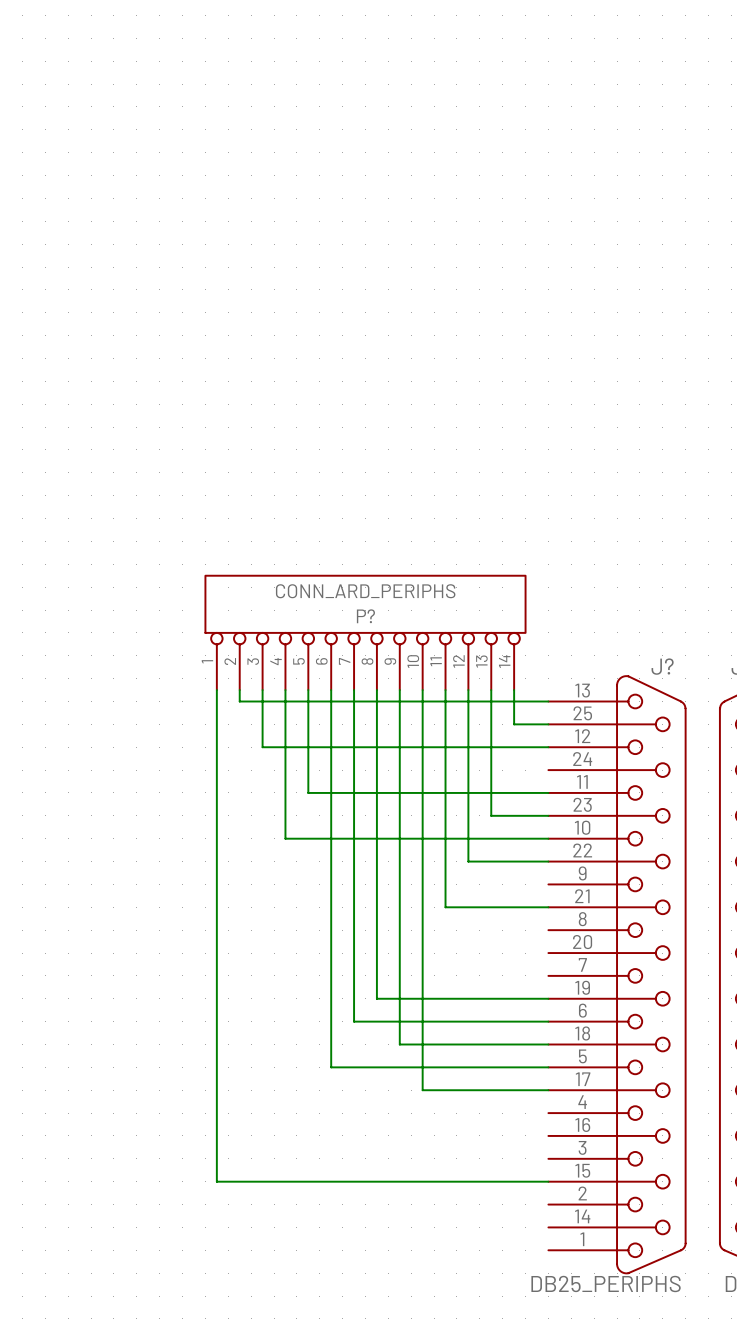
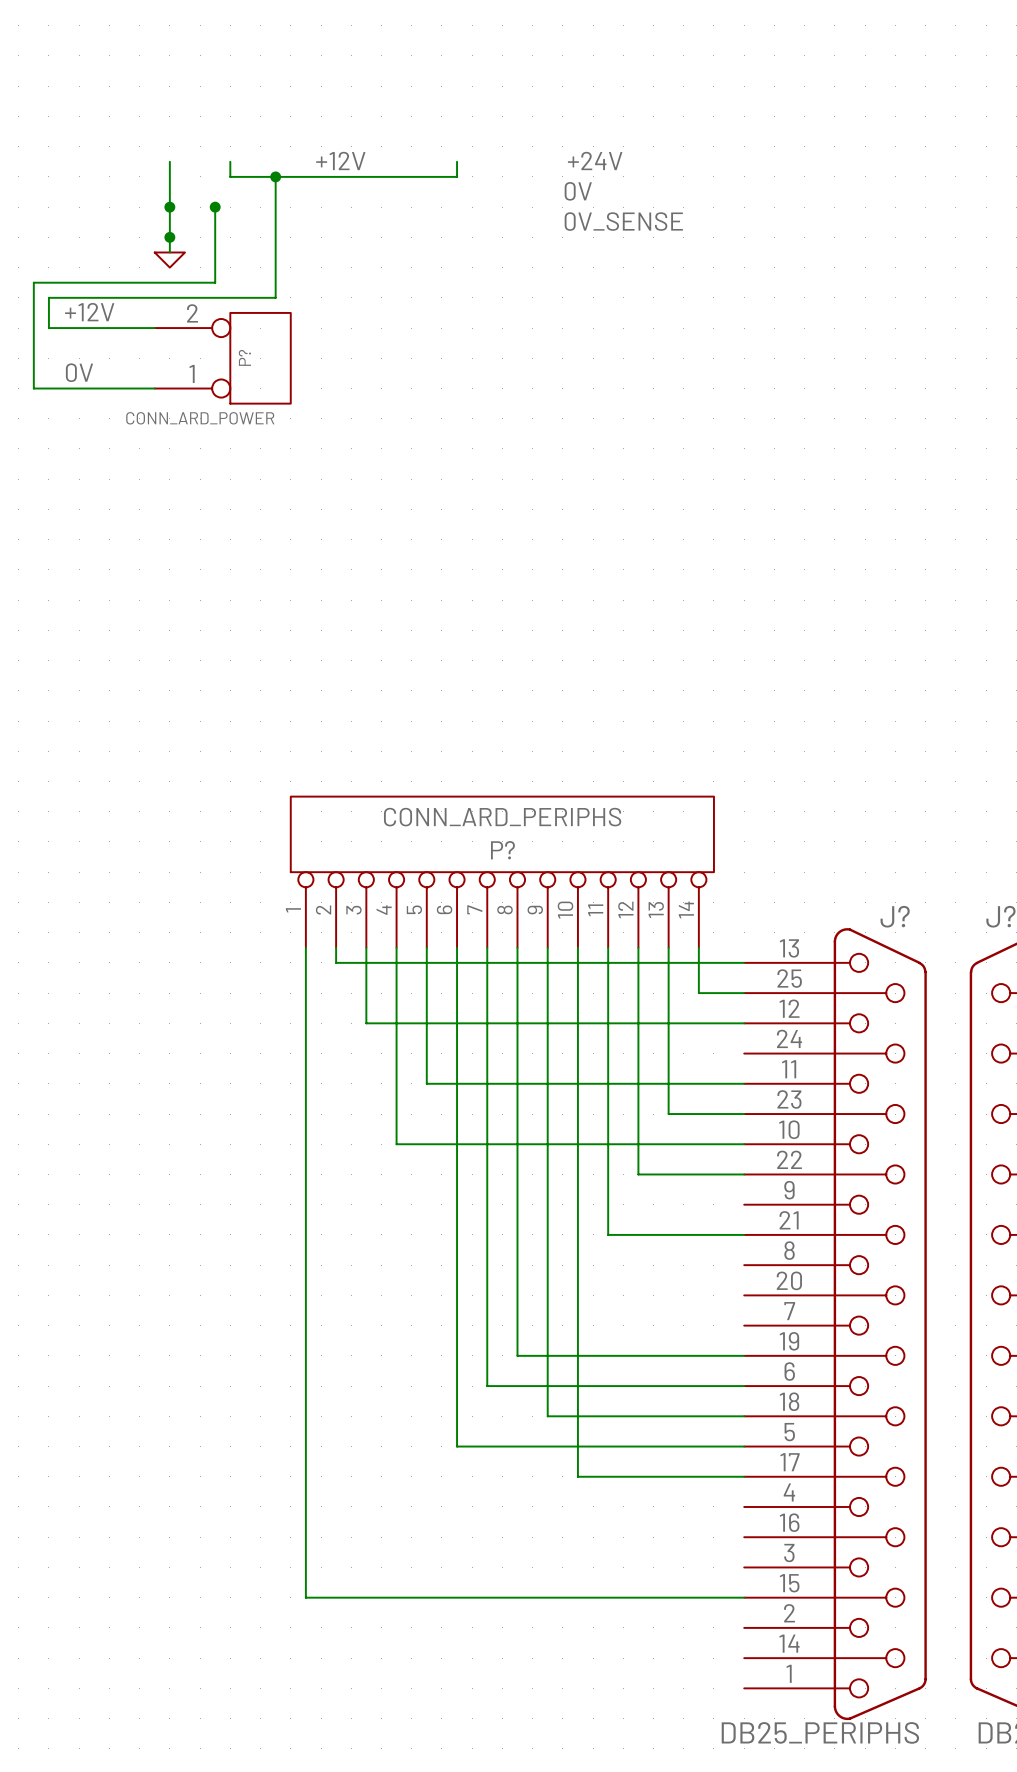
label: none -> +12V (340, 160)
label: none -> +24V (595, 160)
wire: none -> (169, 161) (169, 252)
wire: none -> (230, 161) (230, 176) (457, 176) (457, 161)
wire: none -> (275, 176) (275, 297) (48, 297) (48, 328) (154, 328)
junction: none -> (275, 176)
label: none -> 0V (578, 191)
junction: none -> (169, 207)
wire: none -> (215, 207) (215, 282) (33, 282) (33, 388) (154, 388)
junction: none -> (215, 207)
label: none -> 0V_SENSE (623, 221)
junction: none -> (169, 237)
power symbol: none -> (169, 260)
label: none -> +12V (89, 312)
P?: none -> CONN_ARD_POWER (222, 358)
label: none -> 0V (79, 372)

